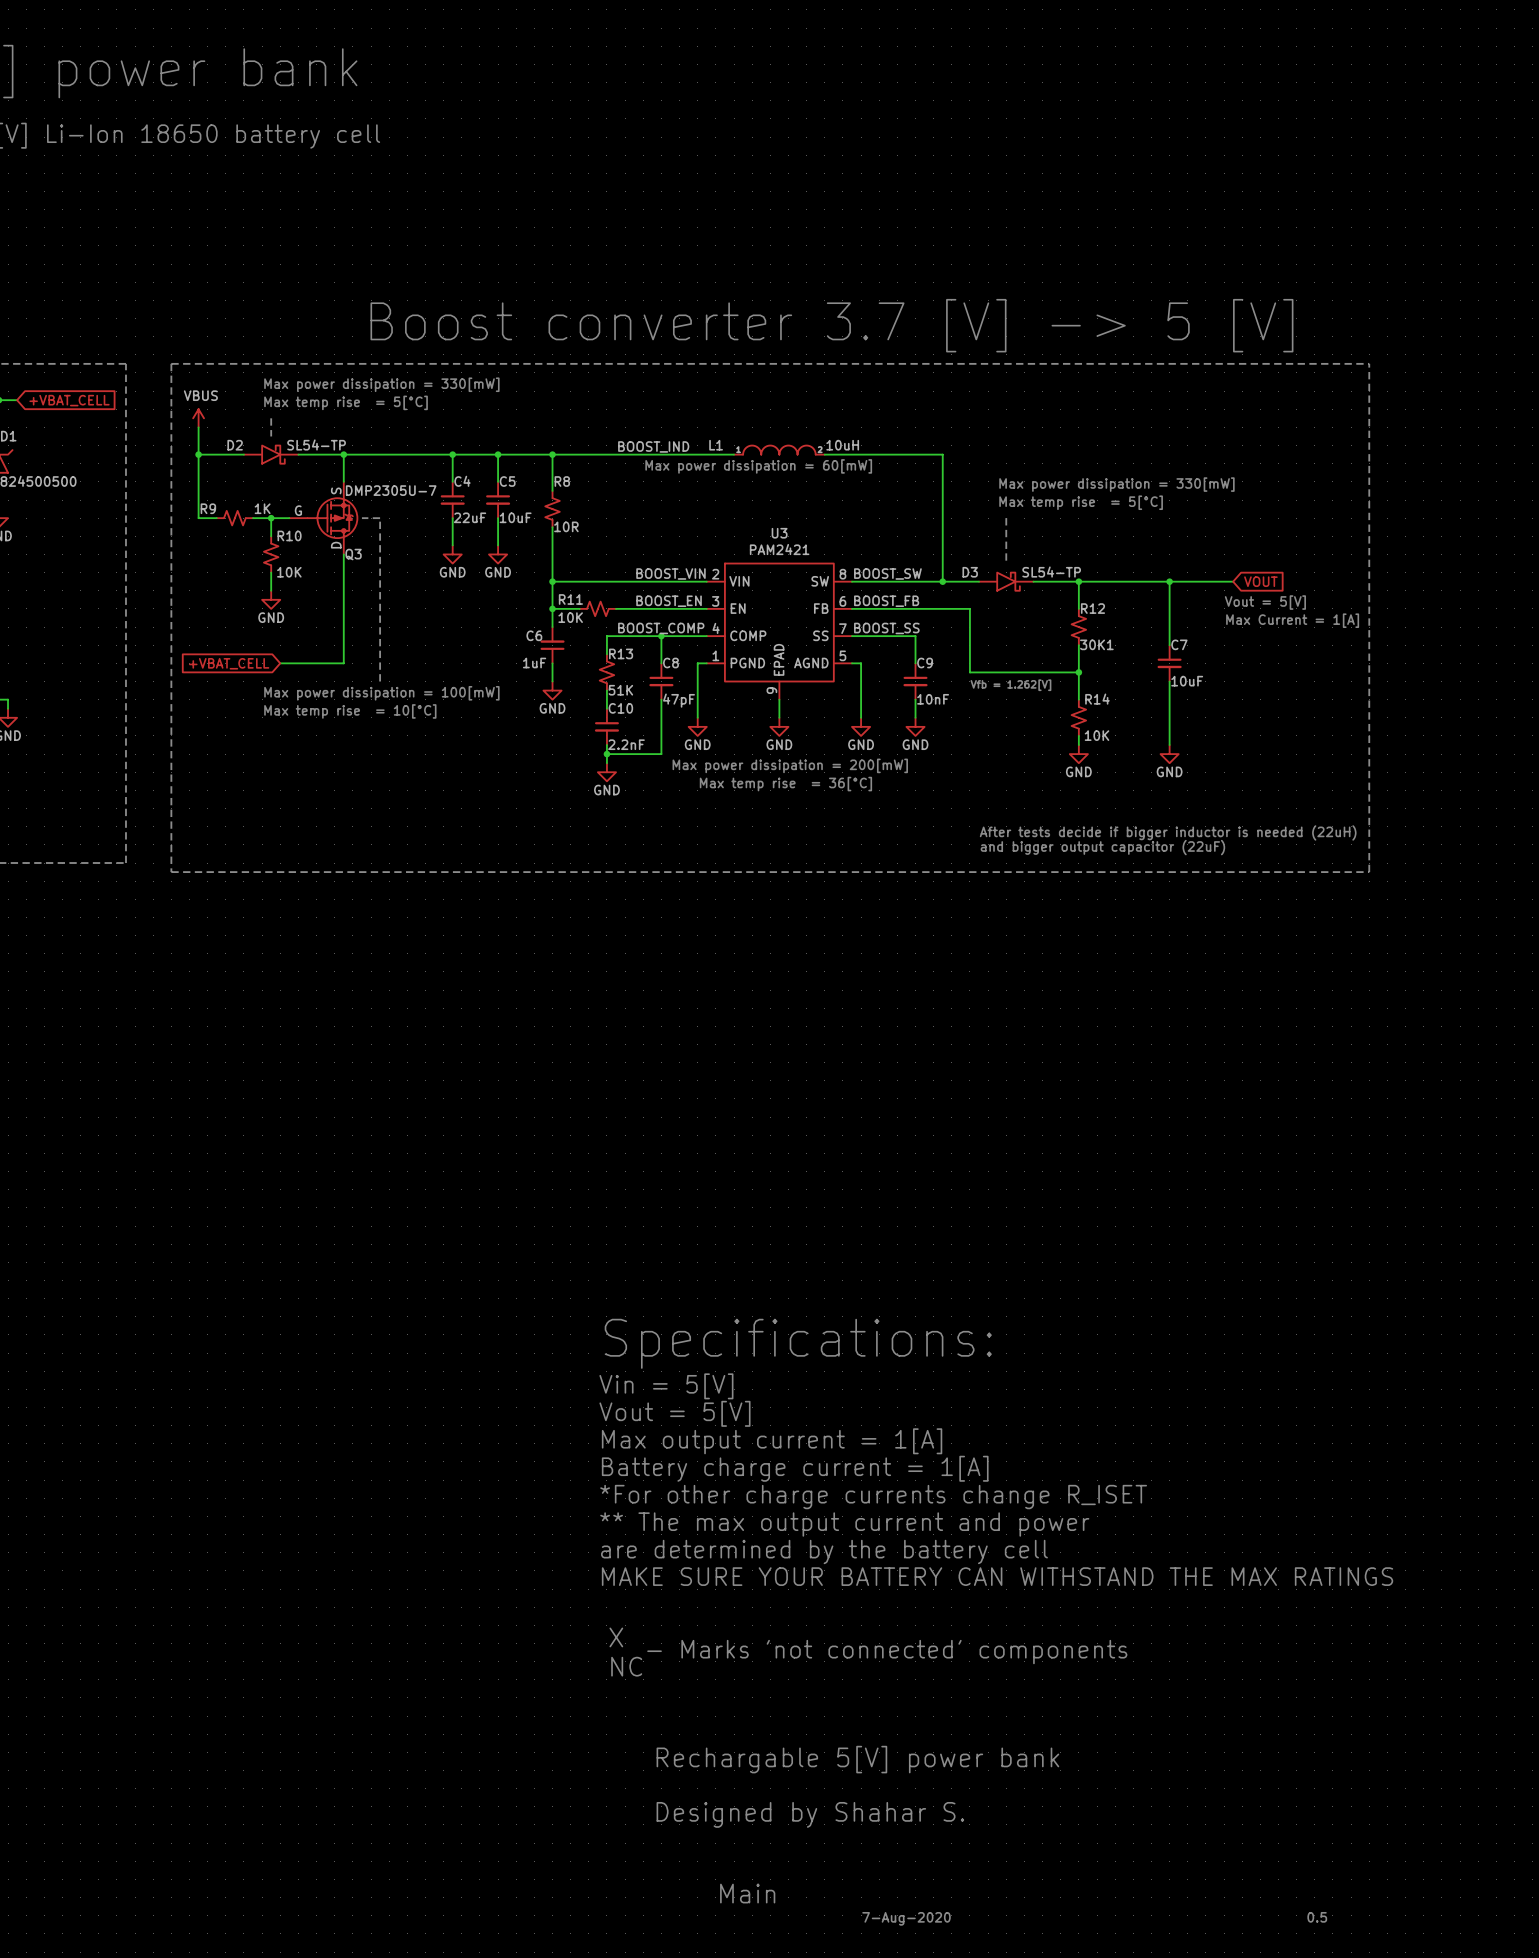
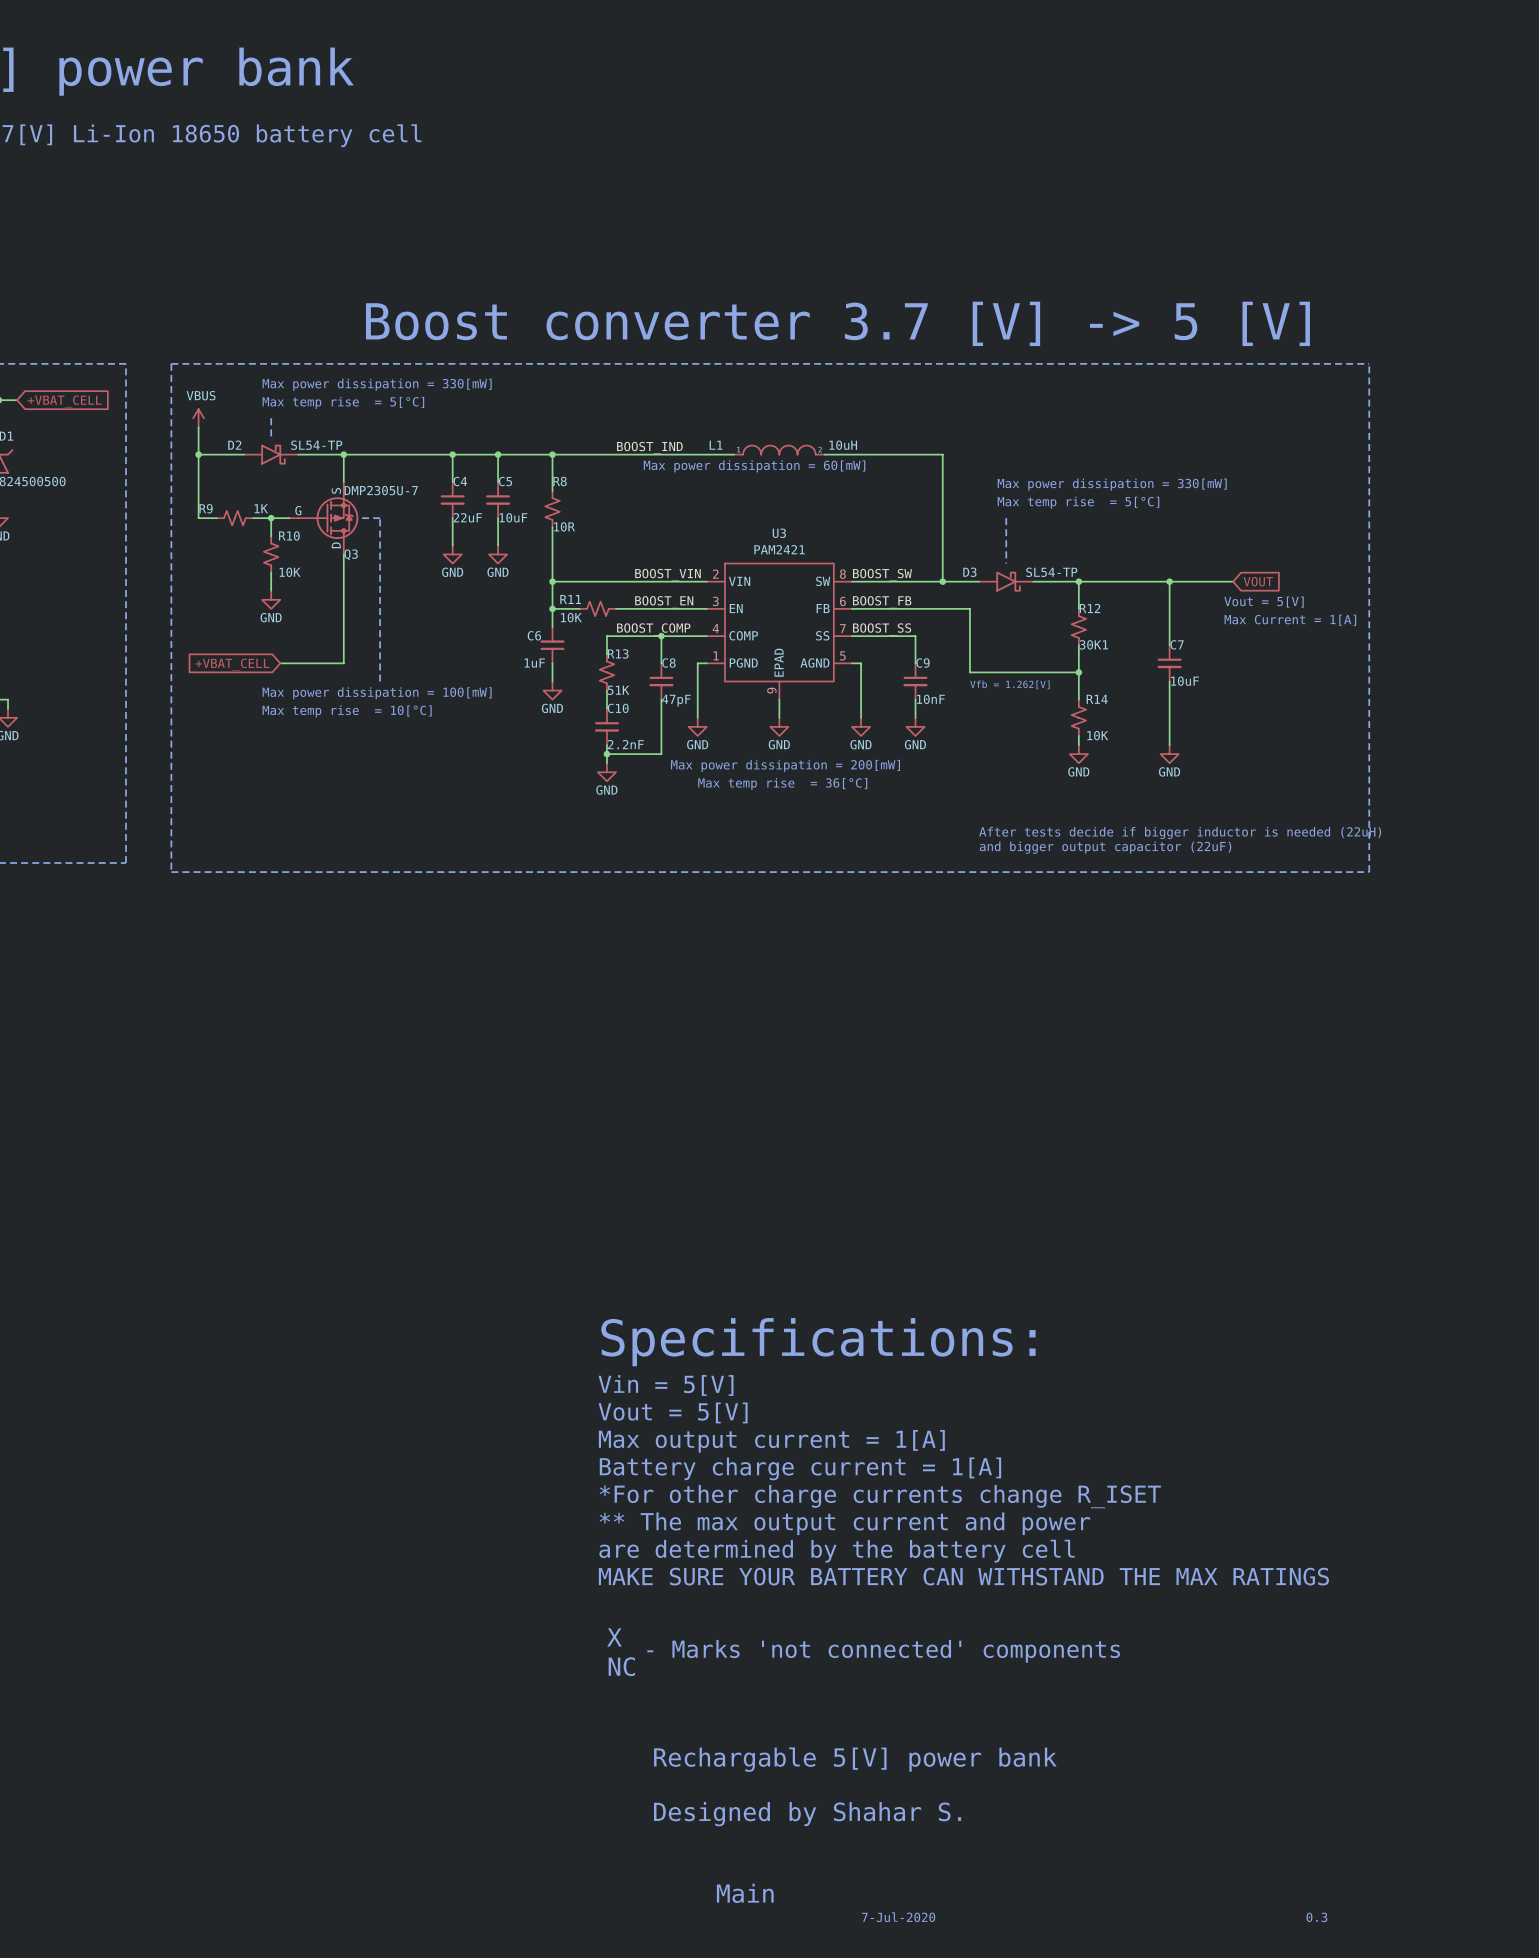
text: 0.5 (1317, 1917) -> 0.3 (1316, 1917)
text: 7-Aug-2020 (906, 1918) -> 7-Jul-2020 (898, 1917)

